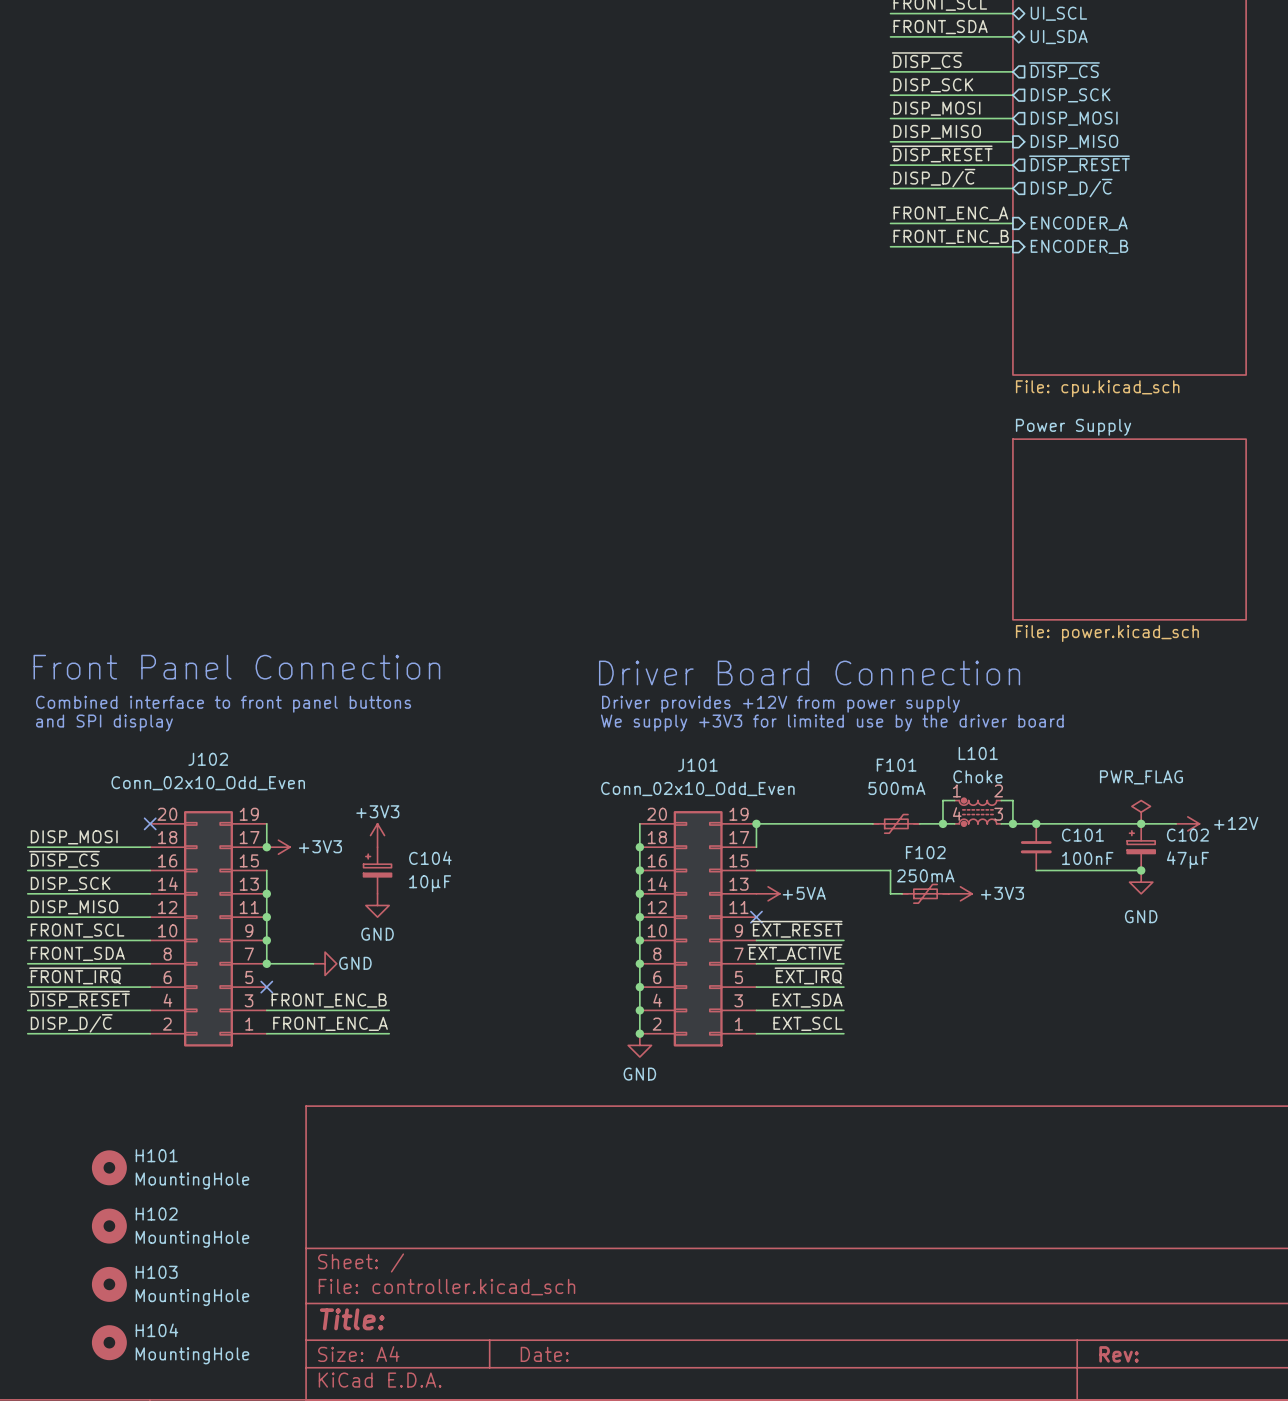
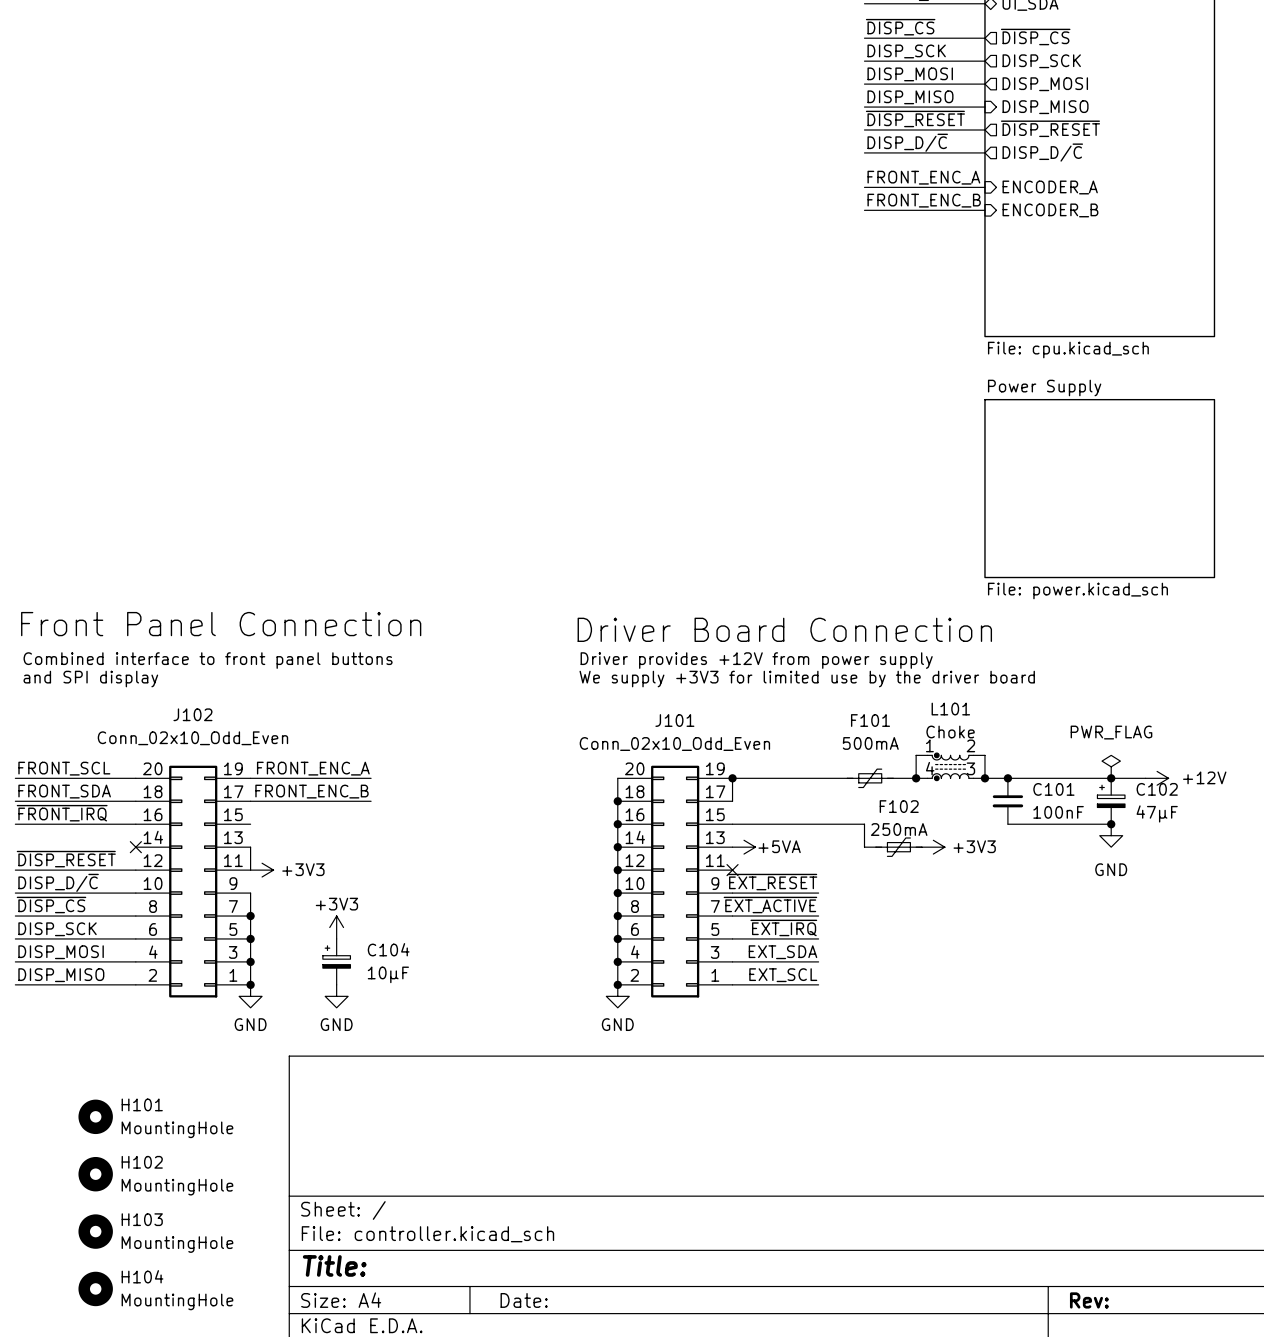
label: none -> FRONT_SCL (64, 768)
no-connect mark: (150, 823) -> none
wire: (266, 823) (266, 847) -> (250, 778) (371, 778)
power symbol: +3V3 (377, 835) -> none
label: DISP_MOSI (74, 837) -> FRONT_SDA (64, 791)
junction: (266, 847) -> none
power symbol: +3V3 (278, 847) -> none
label: ~{DISP_CS} (64, 859) -> ~{FRONT_IRQ} (62, 813)
wire: (266, 870) (266, 893) -> none
C104 position: (377, 870) -> (336, 961)
label: DISP_SCK (70, 883) -> none
wire: (27, 893) (150, 893) -> (15, 778) (135, 778)
no-connect mark: none -> (135, 847)
junction: (266, 893) -> none
power symbol: GND (377, 905) -> none
label: DISP_MISO (74, 907) -> ~{DISP_RESET} (66, 859)
wire: (266, 917) (266, 940) -> none
junction: (266, 917) -> none
power symbol: none -> +3V3 (262, 870)
label: FRONT_SCL (77, 930) -> DISP_D/~{C} (58, 882)
junction: (266, 940) -> none
label: FRONT_SDA (77, 953) -> ~{DISP_CS} (51, 905)
wire: (266, 963) (313, 963) -> (250, 916) (250, 984)
power symbol: GND (325, 963) -> none
label: ~{FRONT_IRQ} (75, 975) -> DISP_SCK (57, 929)
power symbol: none -> +3V3 (336, 927)
junction: none -> (250, 938)
no-connect mark: (266, 987) -> none
label: ~{DISP_RESET} (79, 999) -> DISP_MOSI (61, 952)
label position: FRONT_ENC_B (329, 1000) -> FRONT_ENC_B (311, 791)
wire: (266, 1010) (389, 1010) -> none
junction: none -> (250, 961)
label: DISP_D/~{C} (71, 1023) -> DISP_MISO (61, 975)
label position: FRONT_ENC_A (330, 1023) -> FRONT_ENC_A (313, 768)
wire: (266, 1033) (389, 1033) -> (250, 801) (371, 801)
junction: none -> (250, 984)
power symbol: none -> GND (250, 996)
power symbol: none -> GND (336, 996)

